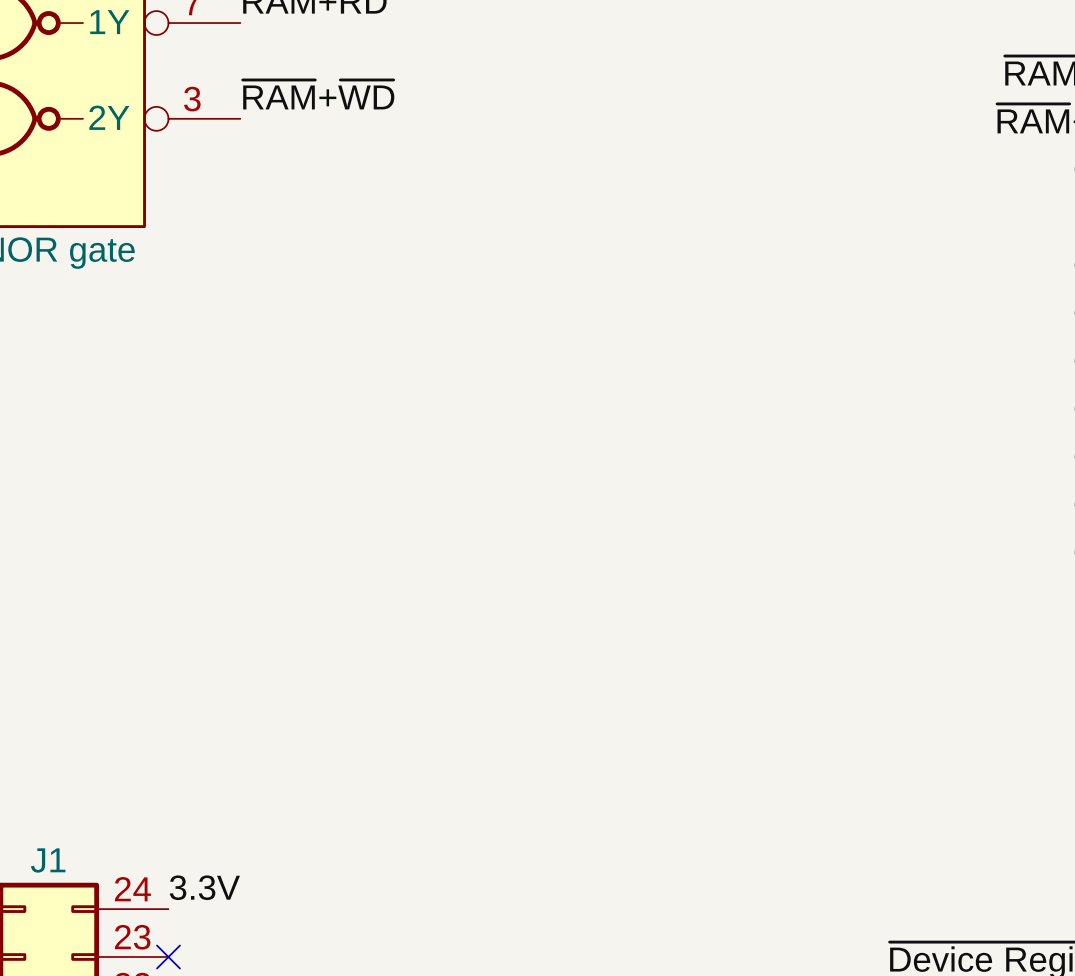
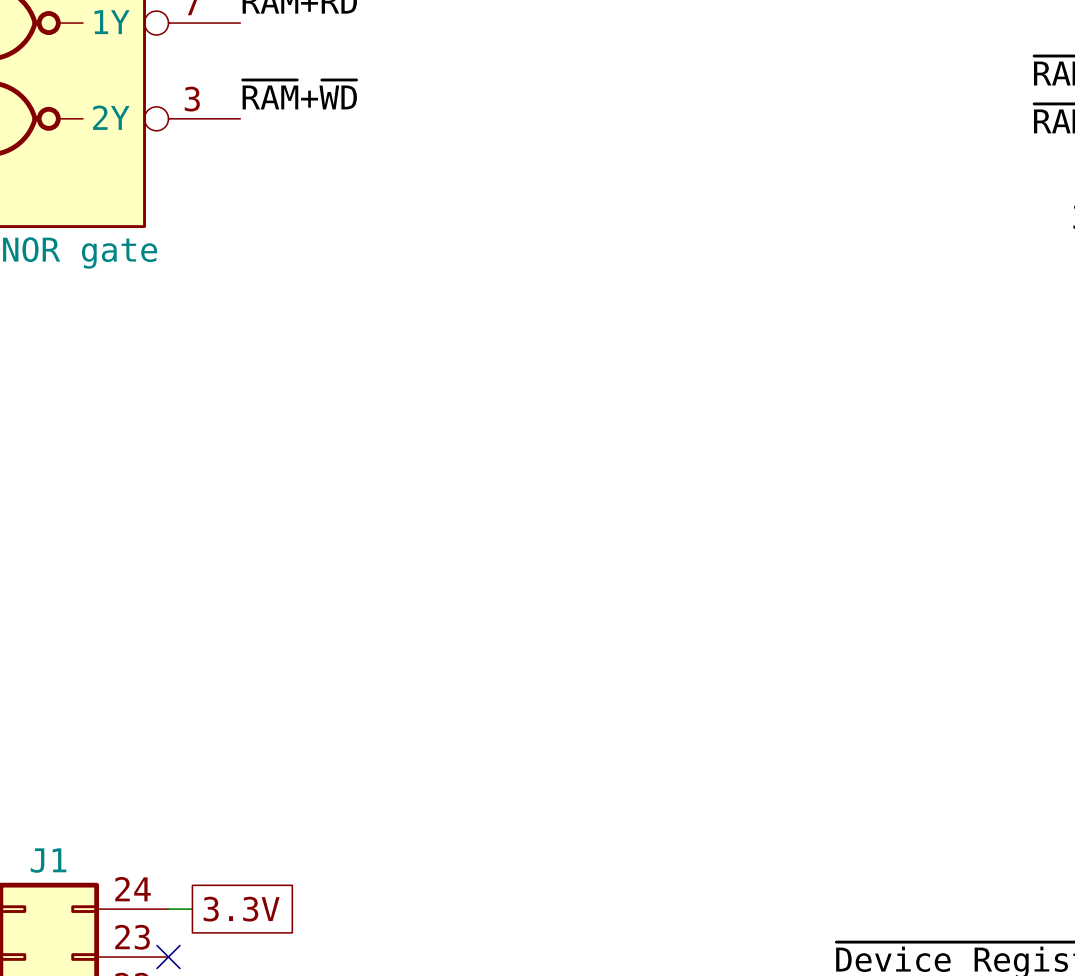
label: 3.3V (204, 887) -> none
wire: none -> (168, 909) (192, 909)
global label: none -> 3.3V (241, 909)

